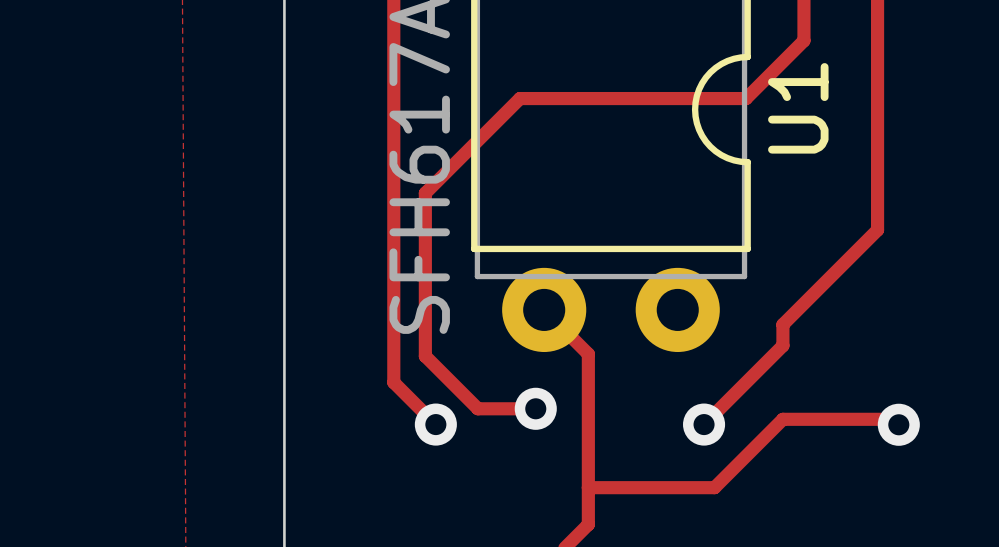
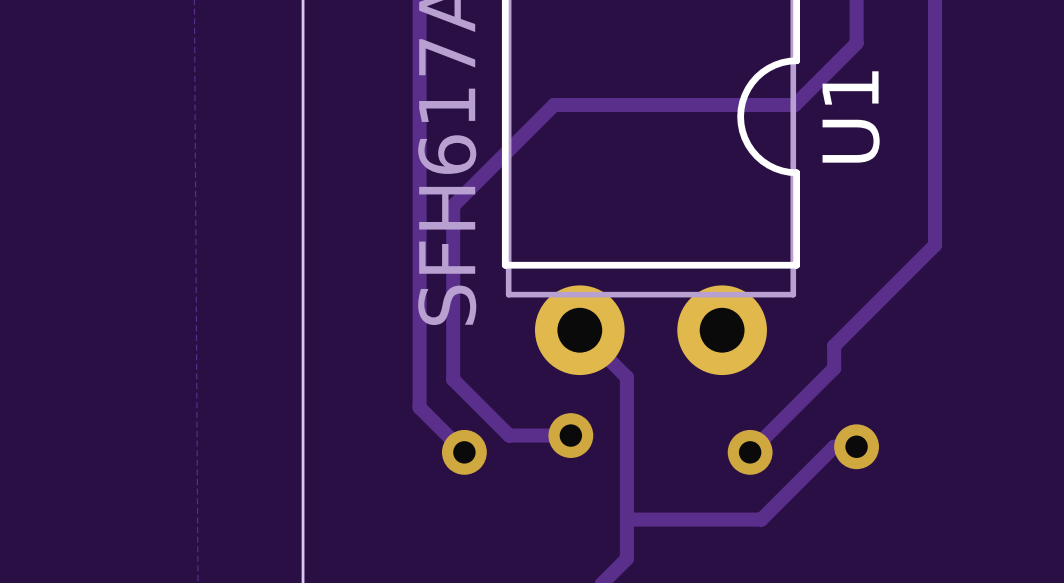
track: (803, 419) (893, 419) (898, 424) -> none
via position: (898, 424) -> (856, 446)

